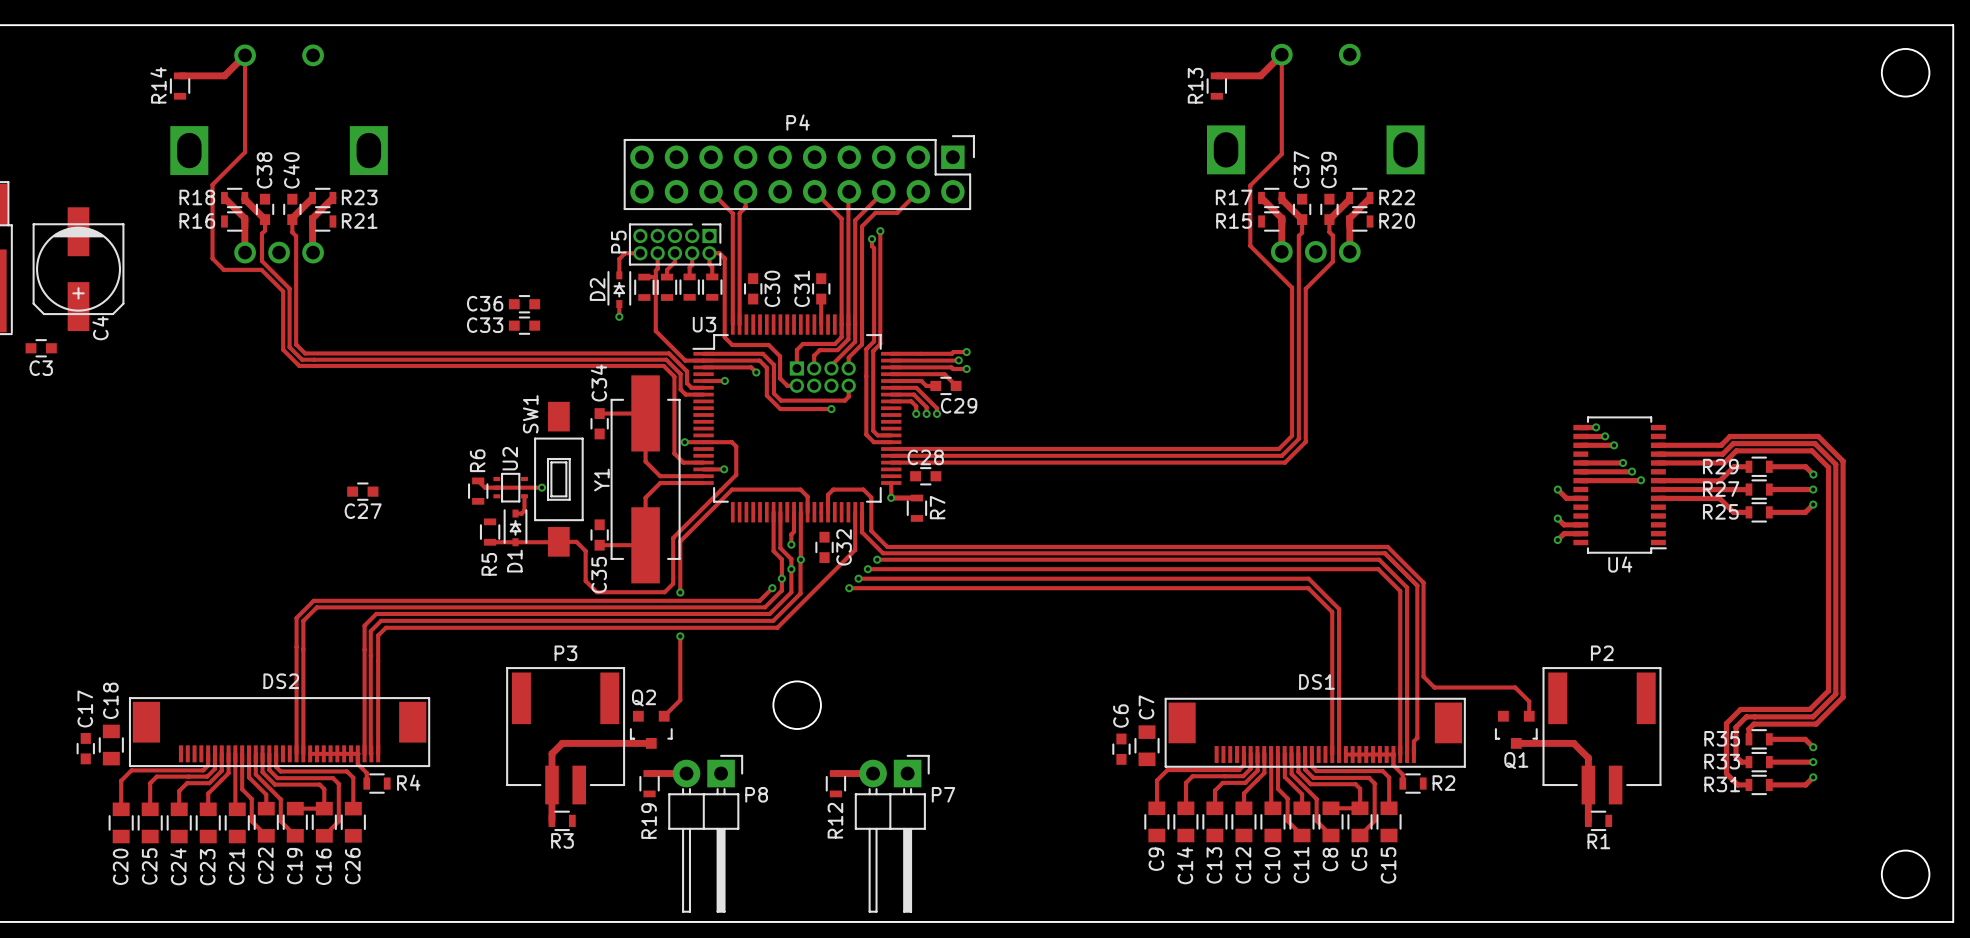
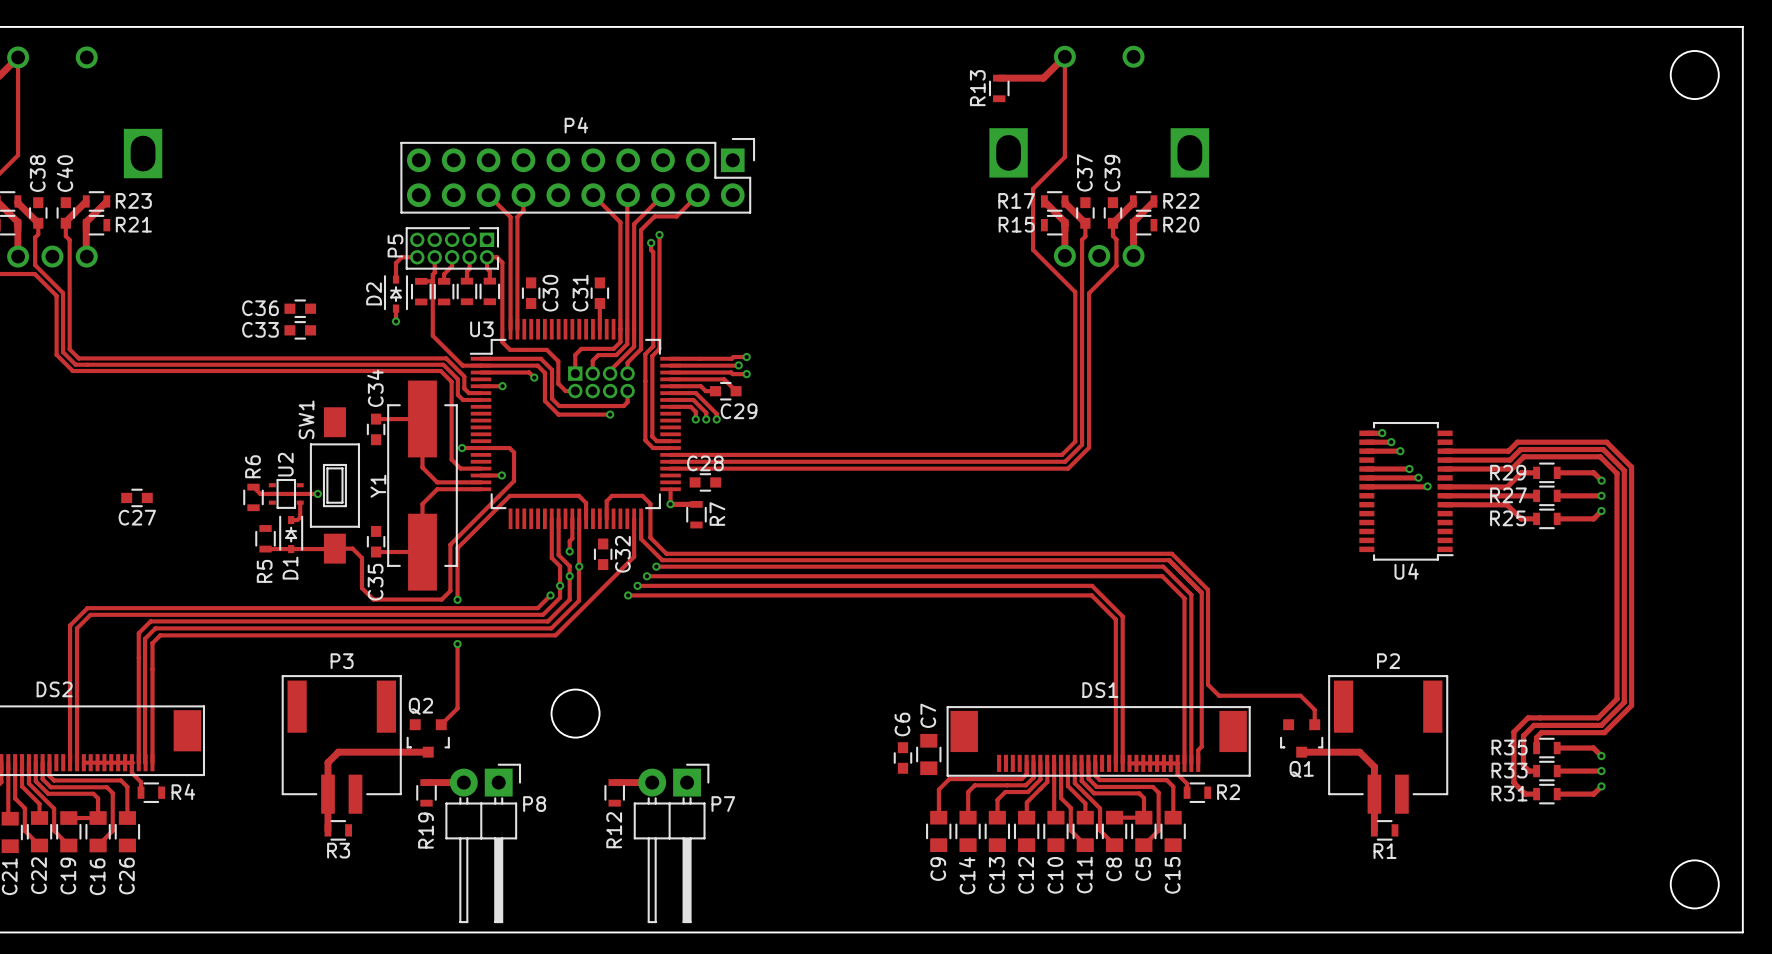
track: (1557, 489) (1566, 498) (1580, 498) -> none
via: (1557, 489) -> none
track: (1557, 518) (1564, 524) (1580, 524) -> none
via: (1557, 518) -> none
track: (1580, 533) (1564, 533) (1557, 540) -> none
via: (1557, 540) -> none

